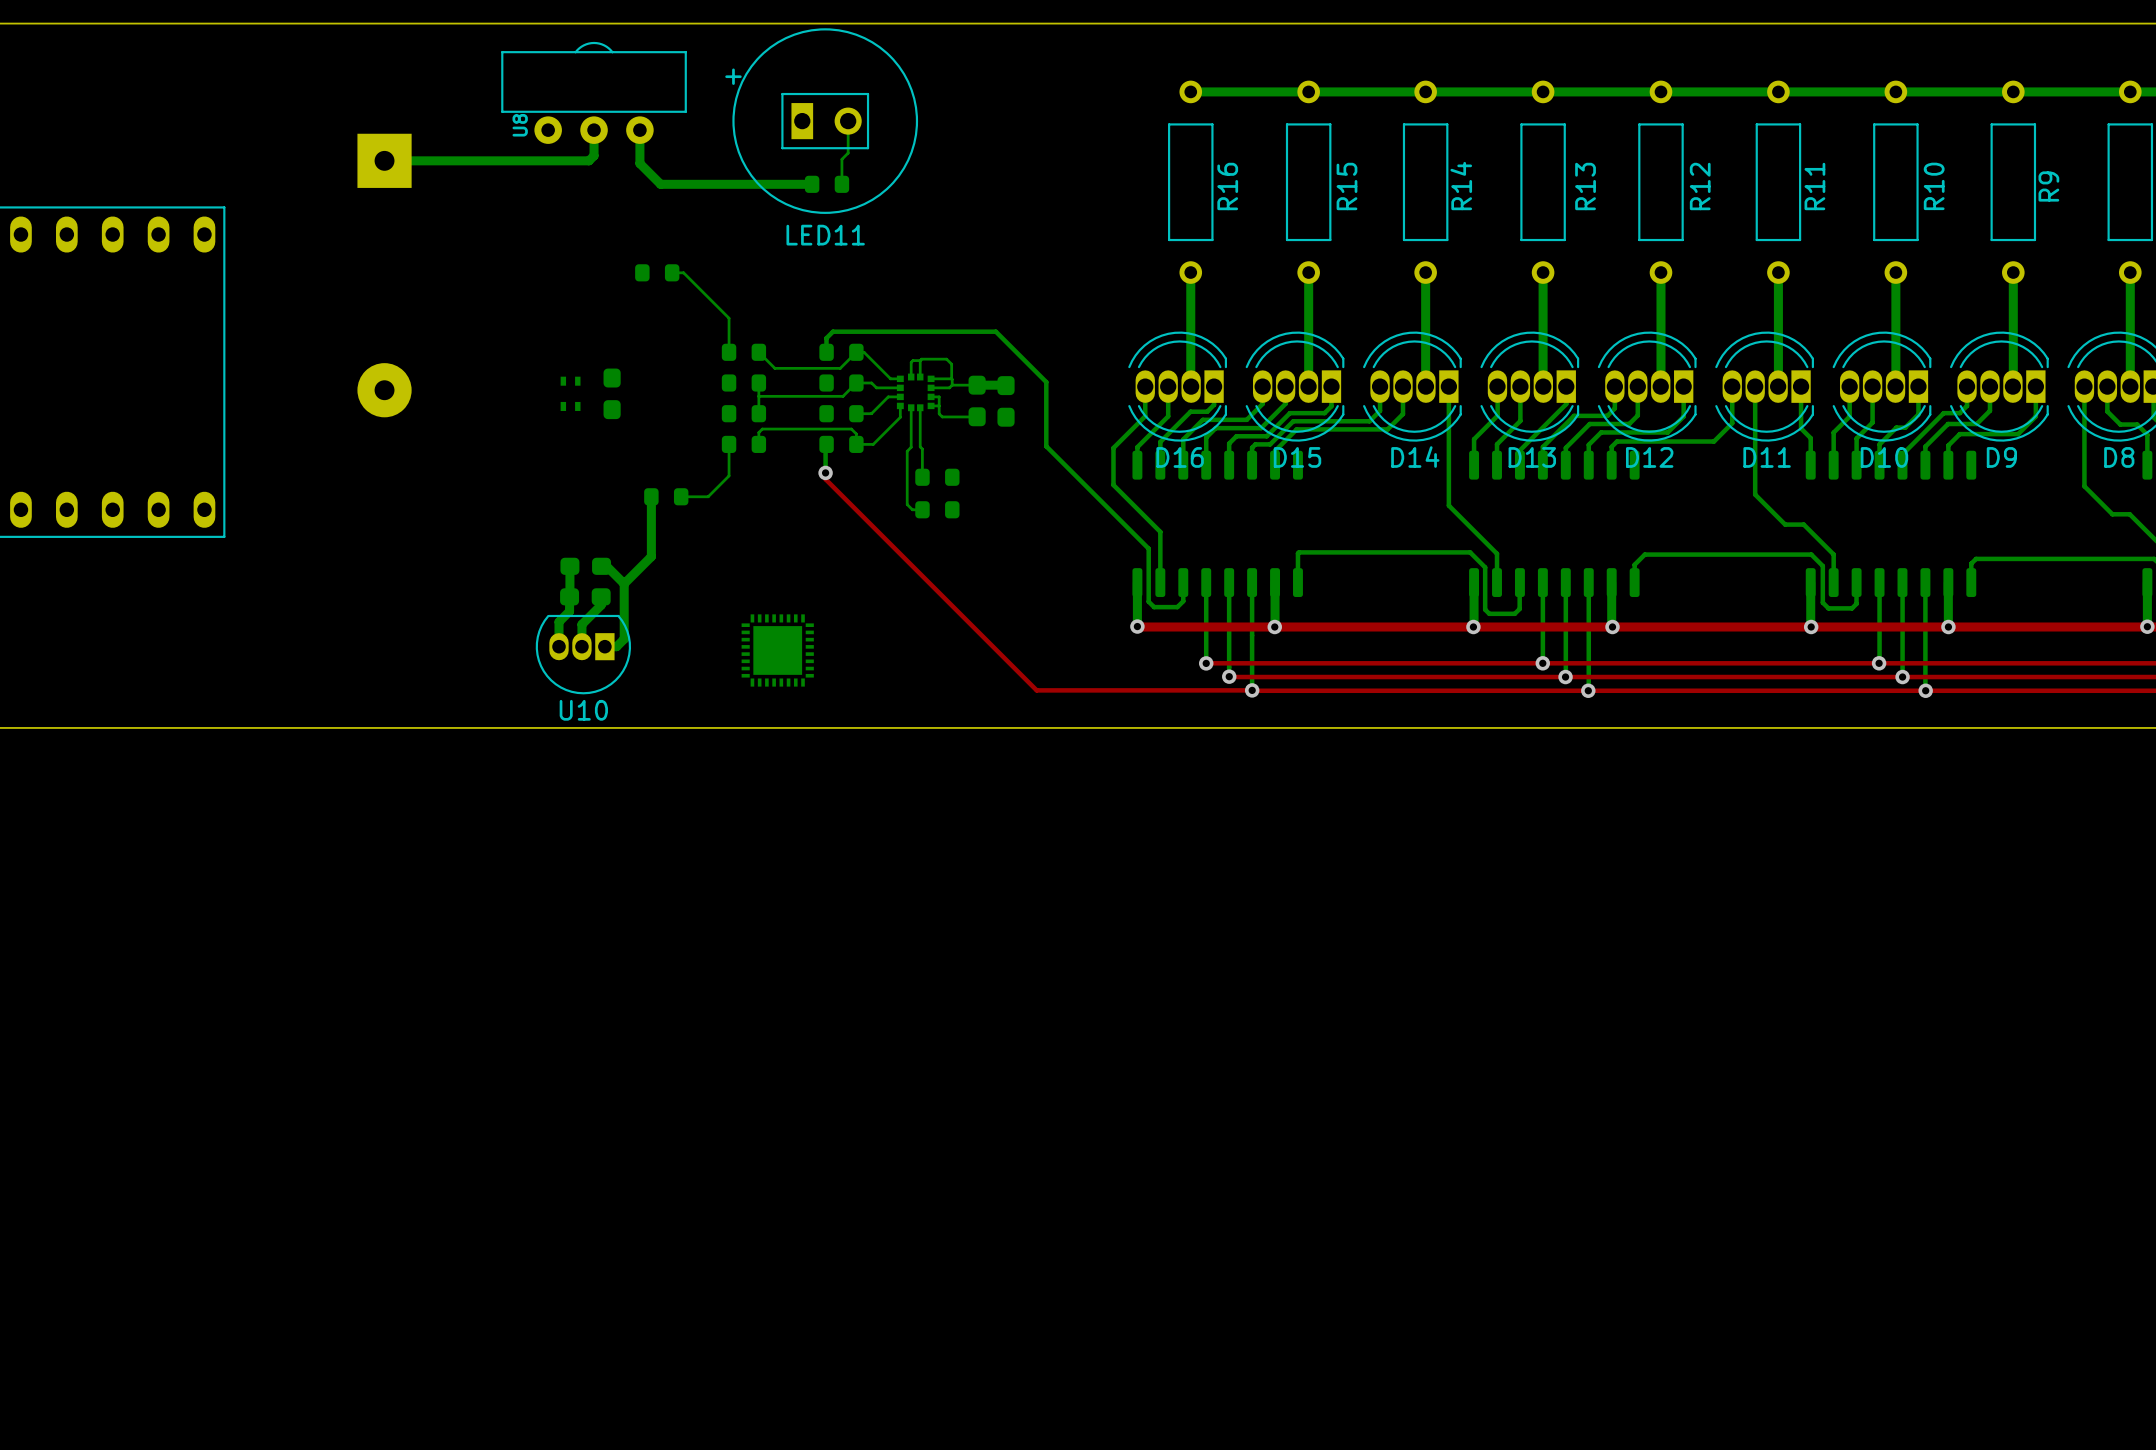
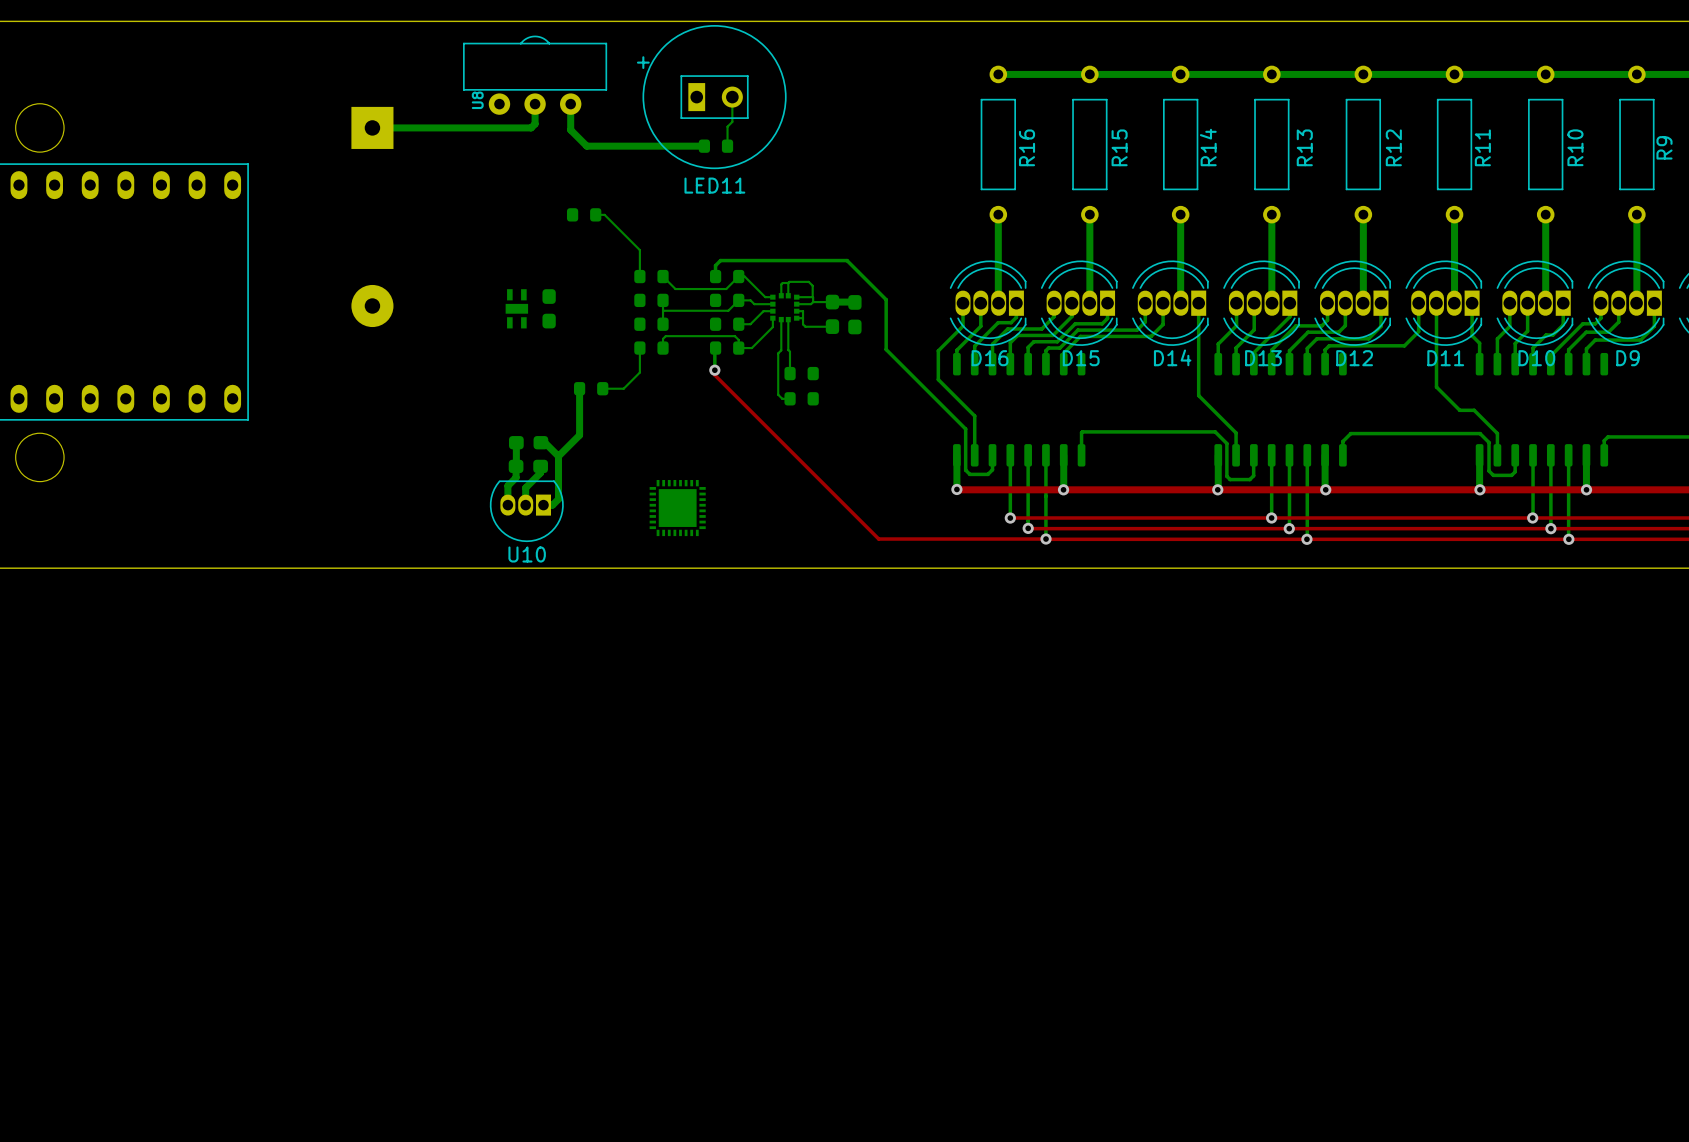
part footprint: [560, 376, 581, 411] -> [505, 289, 529, 329]

